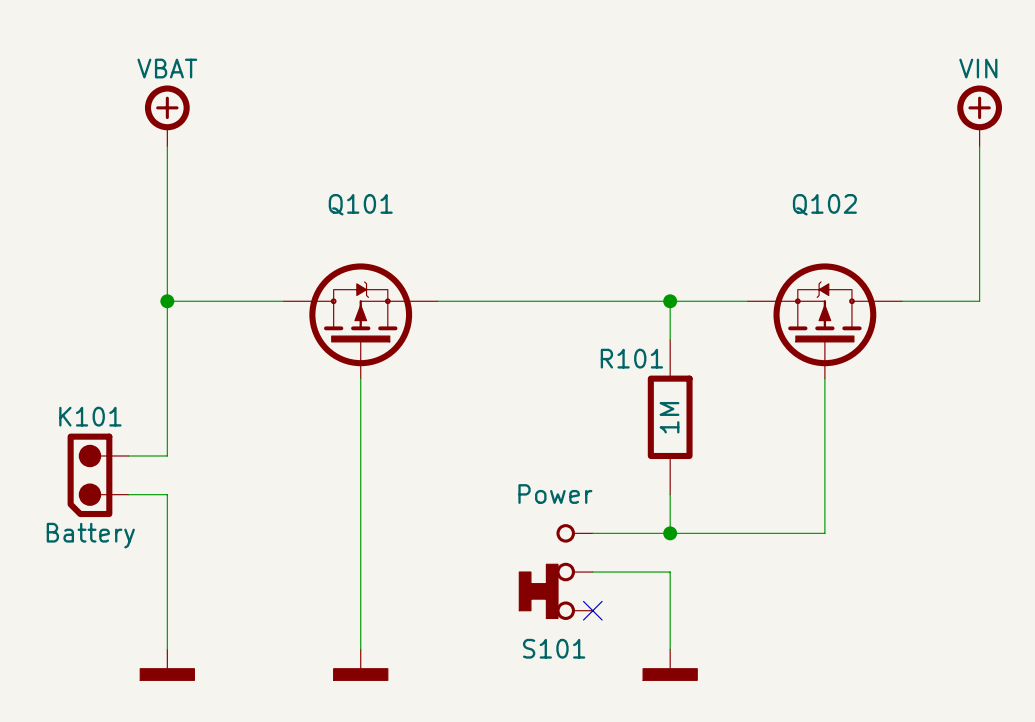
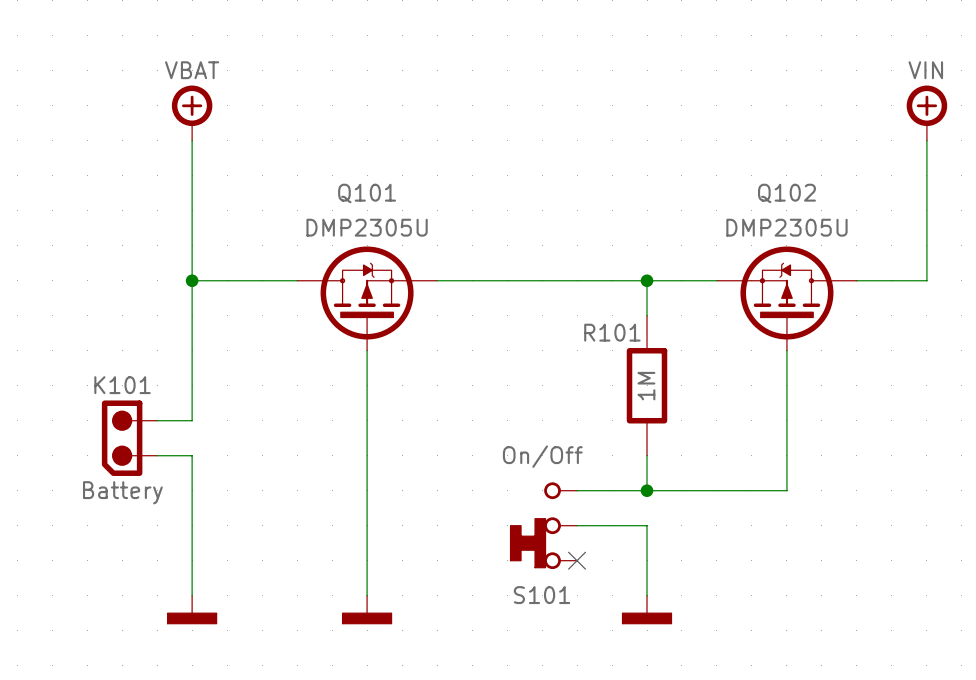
Q101 value: none -> DMP2305U (367, 227)
Q102 value: none -> DMP2305U (786, 227)
S101 value: Power (555, 494) -> On/Off (542, 456)

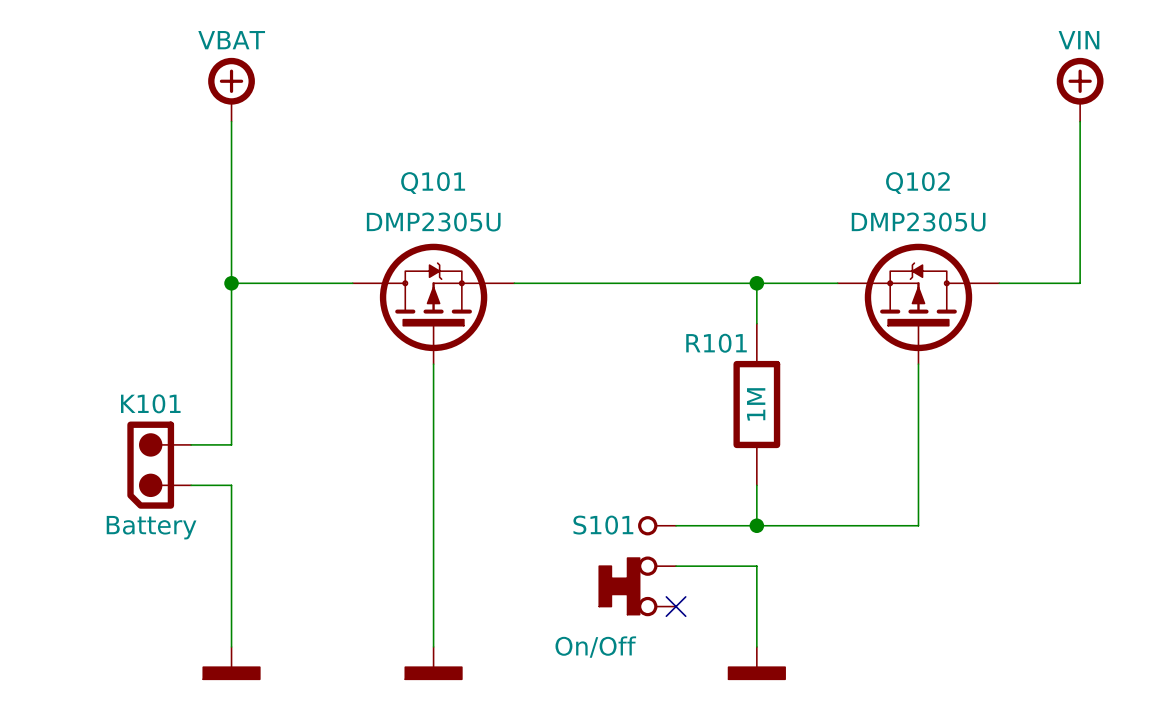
S101 value position: On/Off (542, 456) -> On/Off (595, 647)
S101 name position: S101 (542, 595) -> S101 (603, 525)

